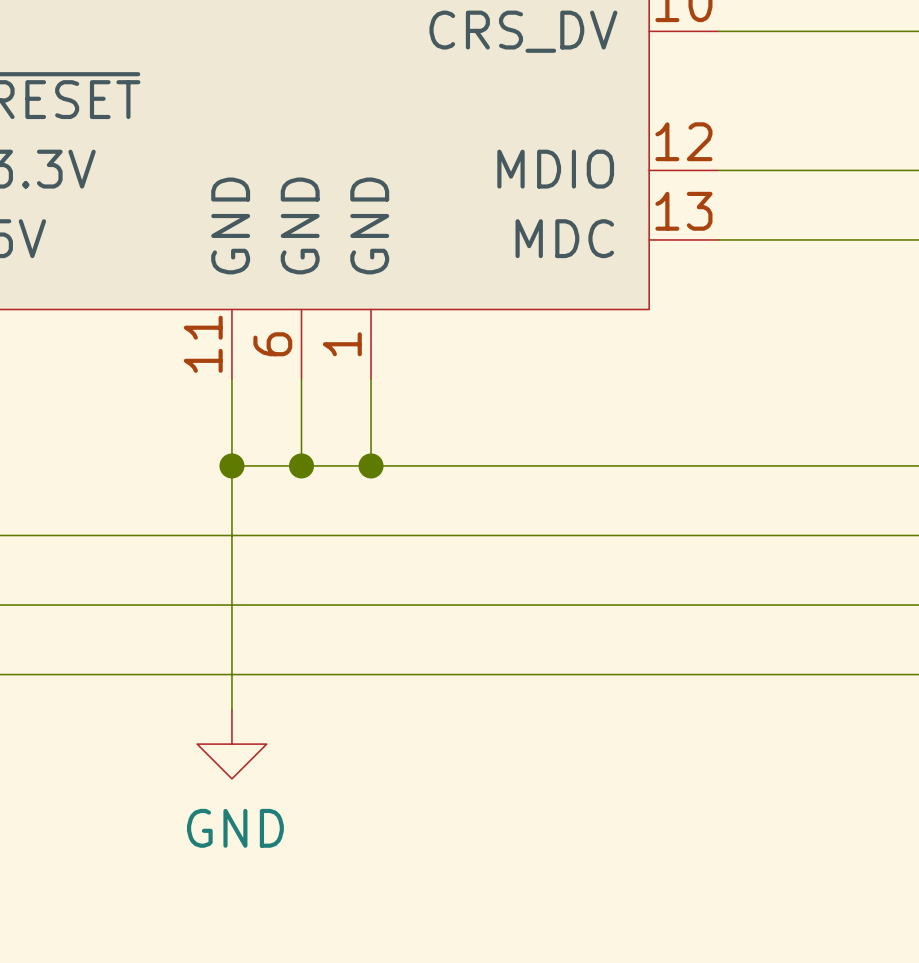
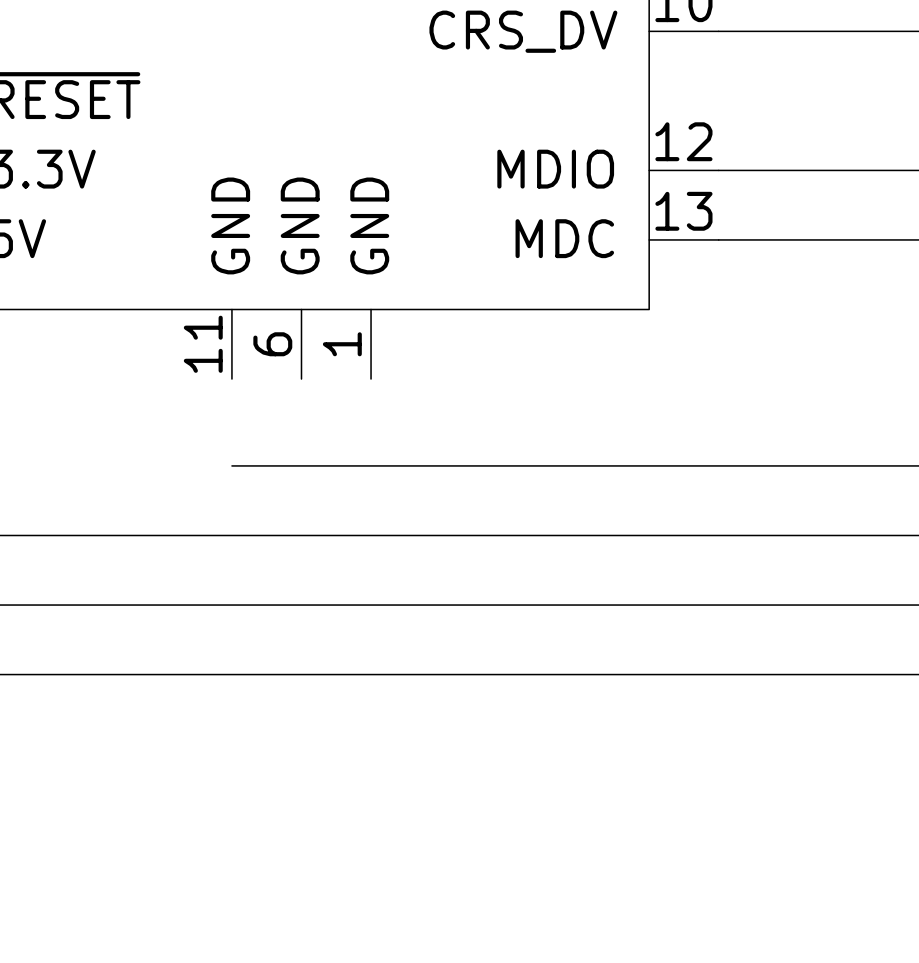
wire: (231, 379) (231, 709) -> none
wire: (301, 379) (301, 465) -> none
wire: (371, 379) (371, 465) -> none
junction: (231, 465) -> none
junction: (301, 465) -> none
junction: (371, 465) -> none
power symbol: GND (231, 744) -> none

